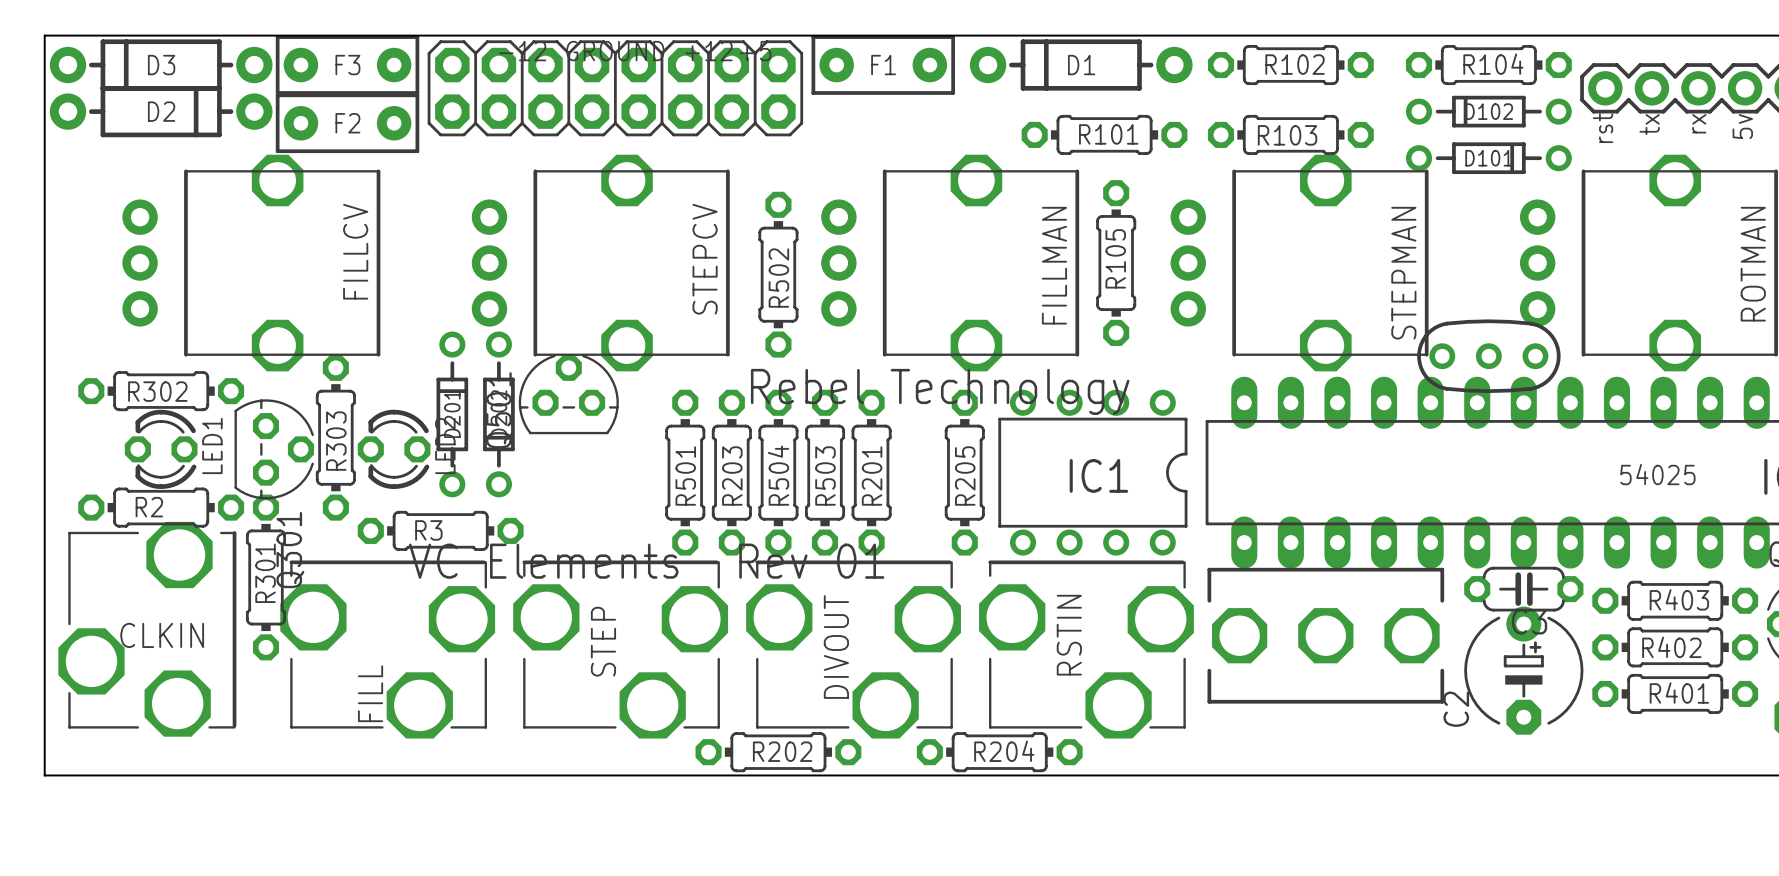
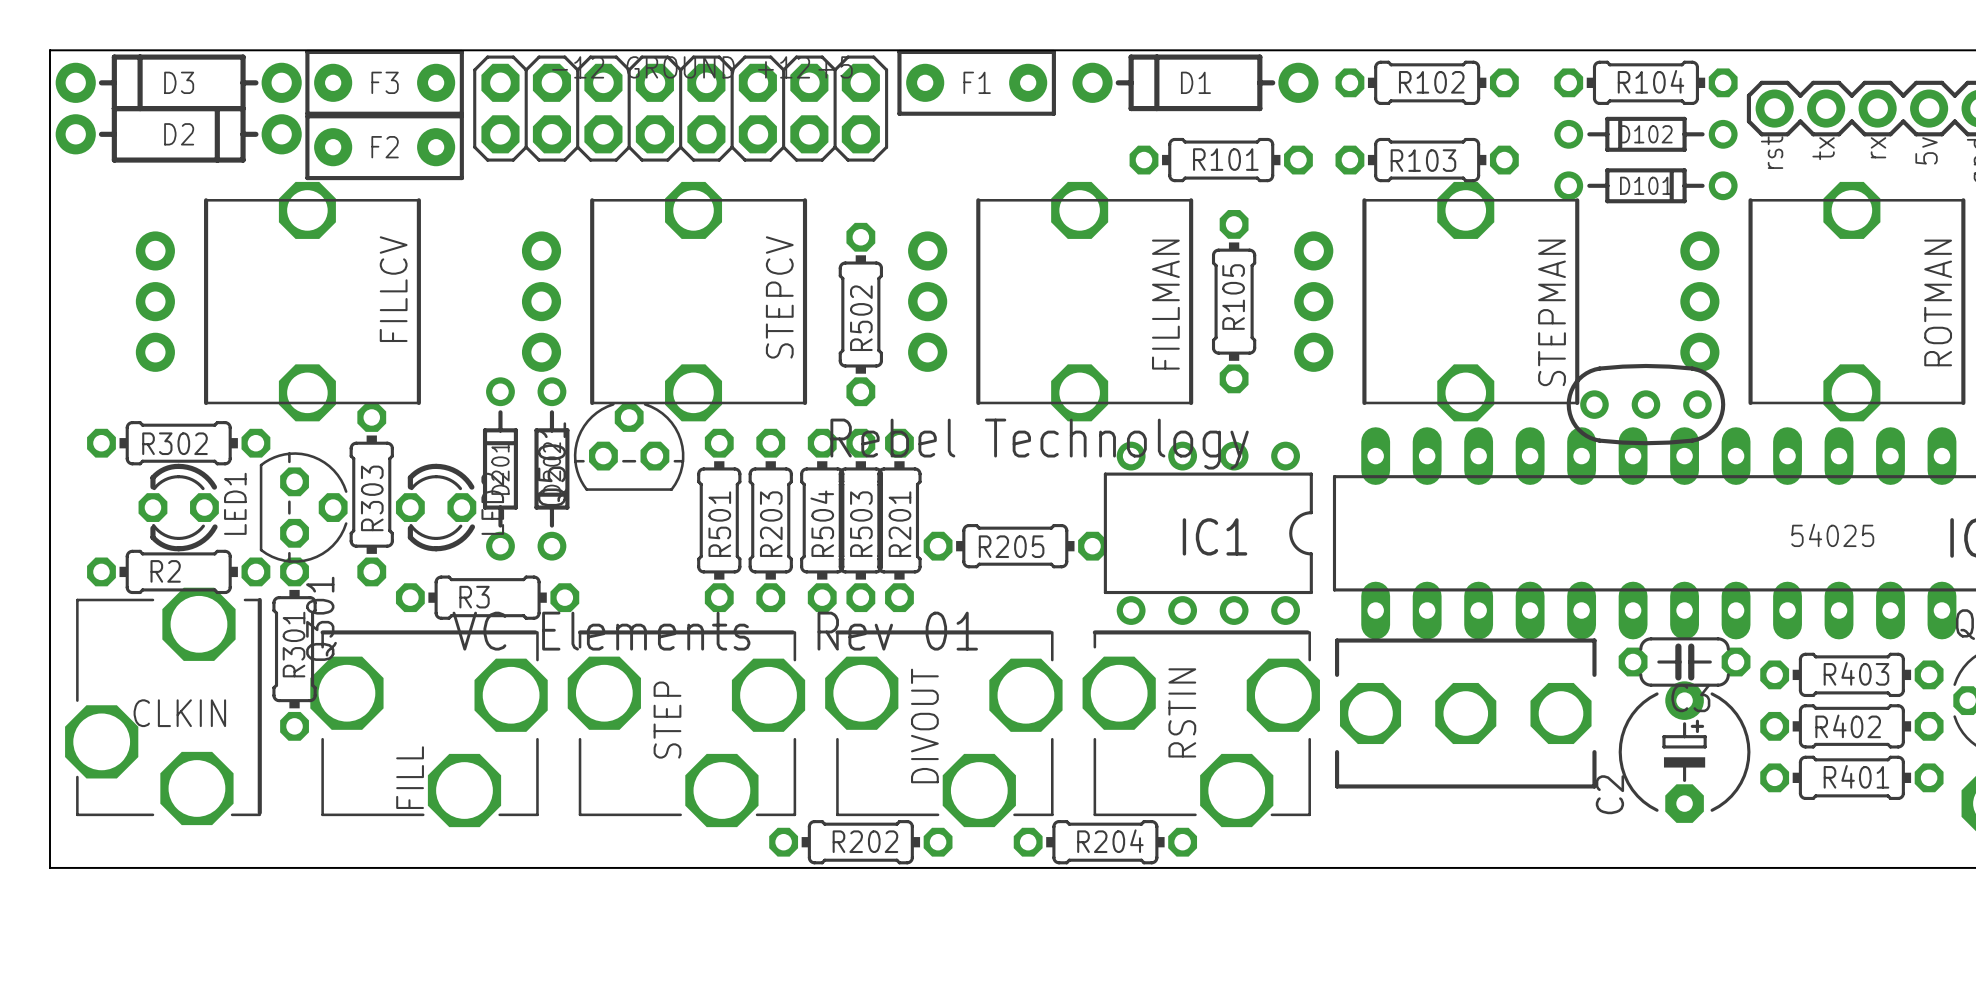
R501 position: (685, 472) -> (719, 520)
R203 position: (731, 472) -> (770, 520)
R504 position: (778, 472) -> (822, 520)
R503 position: (825, 472) -> (860, 520)
R201 position: (871, 472) -> (899, 520)
R205 rotation: 0° (964, 472) -> 90° clockwise (1015, 546)

